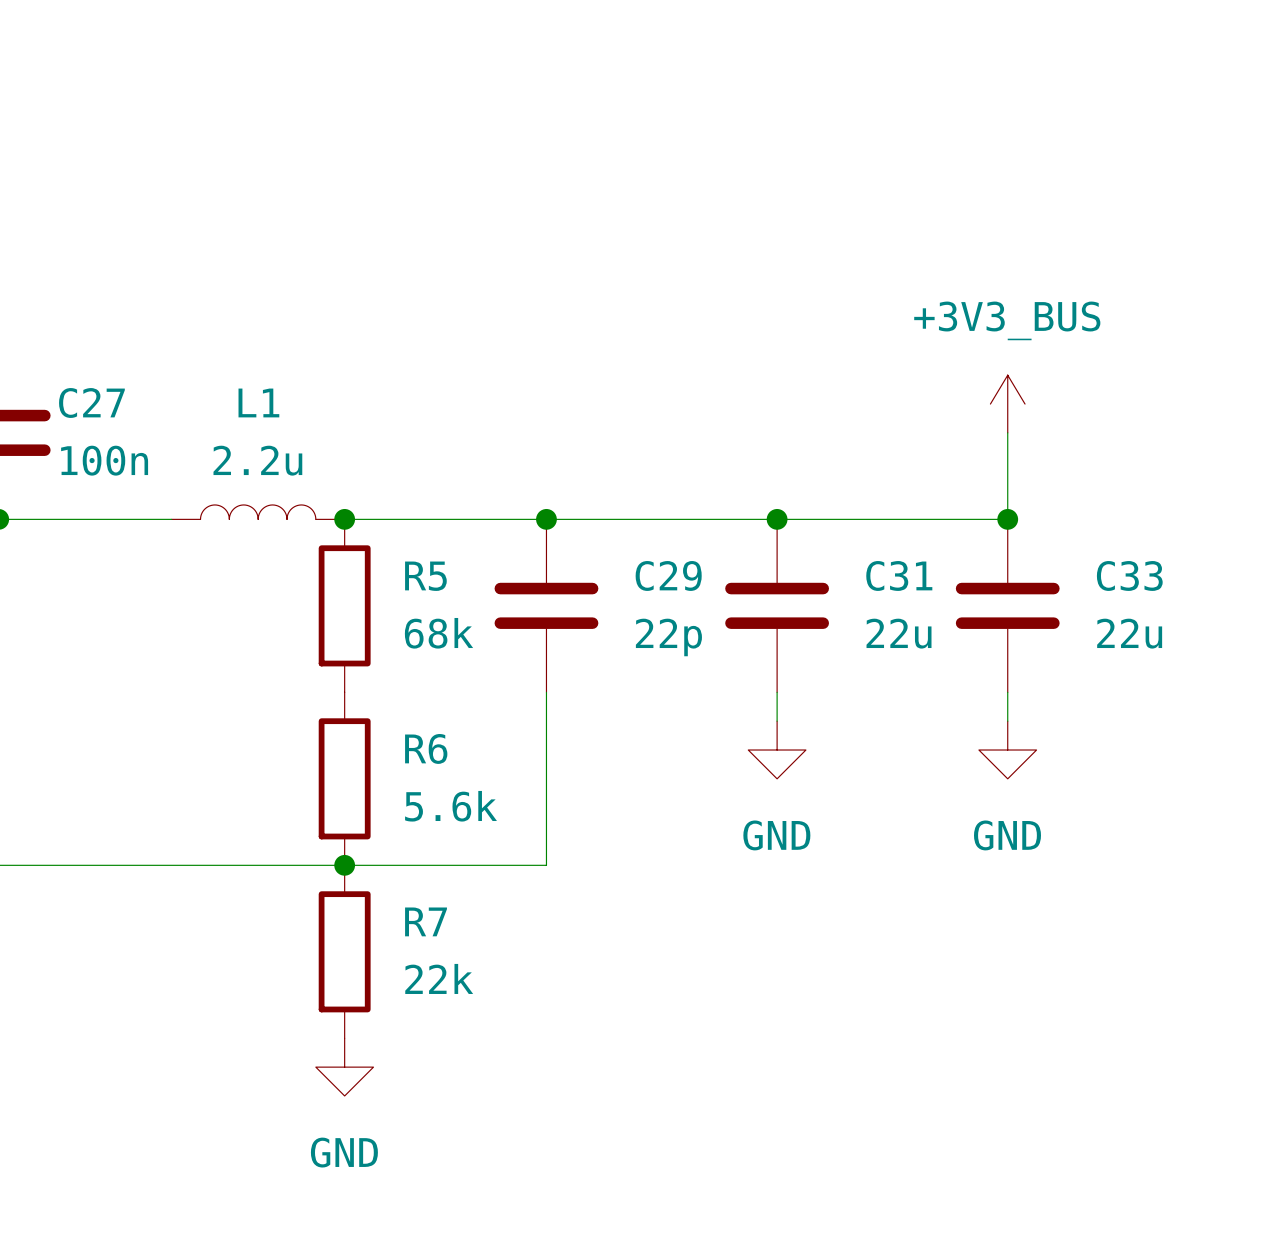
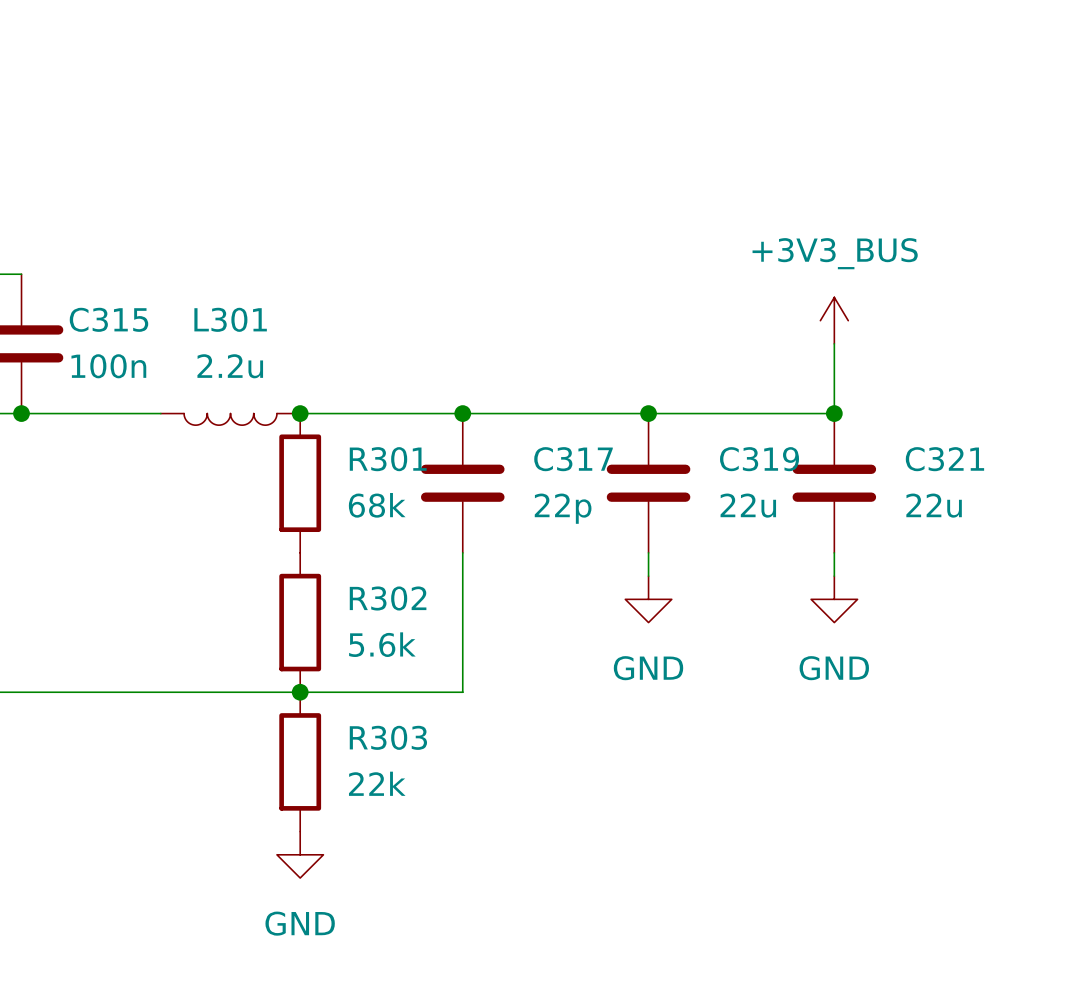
C27 name: C27 (91, 403) -> C315 (108, 319)
L1: 2.2u (258, 512) -> none
L301: none -> 2.2u (230, 419)
C29 name: C29 (668, 575) -> C317 (573, 459)
C31 name: C31 (899, 575) -> C319 (759, 459)
C33 name: C33 (1129, 575) -> C321 (944, 459)
R5 name: R5 (425, 576) -> R301 (388, 459)
R6 name: R6 (426, 748) -> R302 (388, 598)
R7 name: R7 (426, 921) -> R303 (388, 737)

